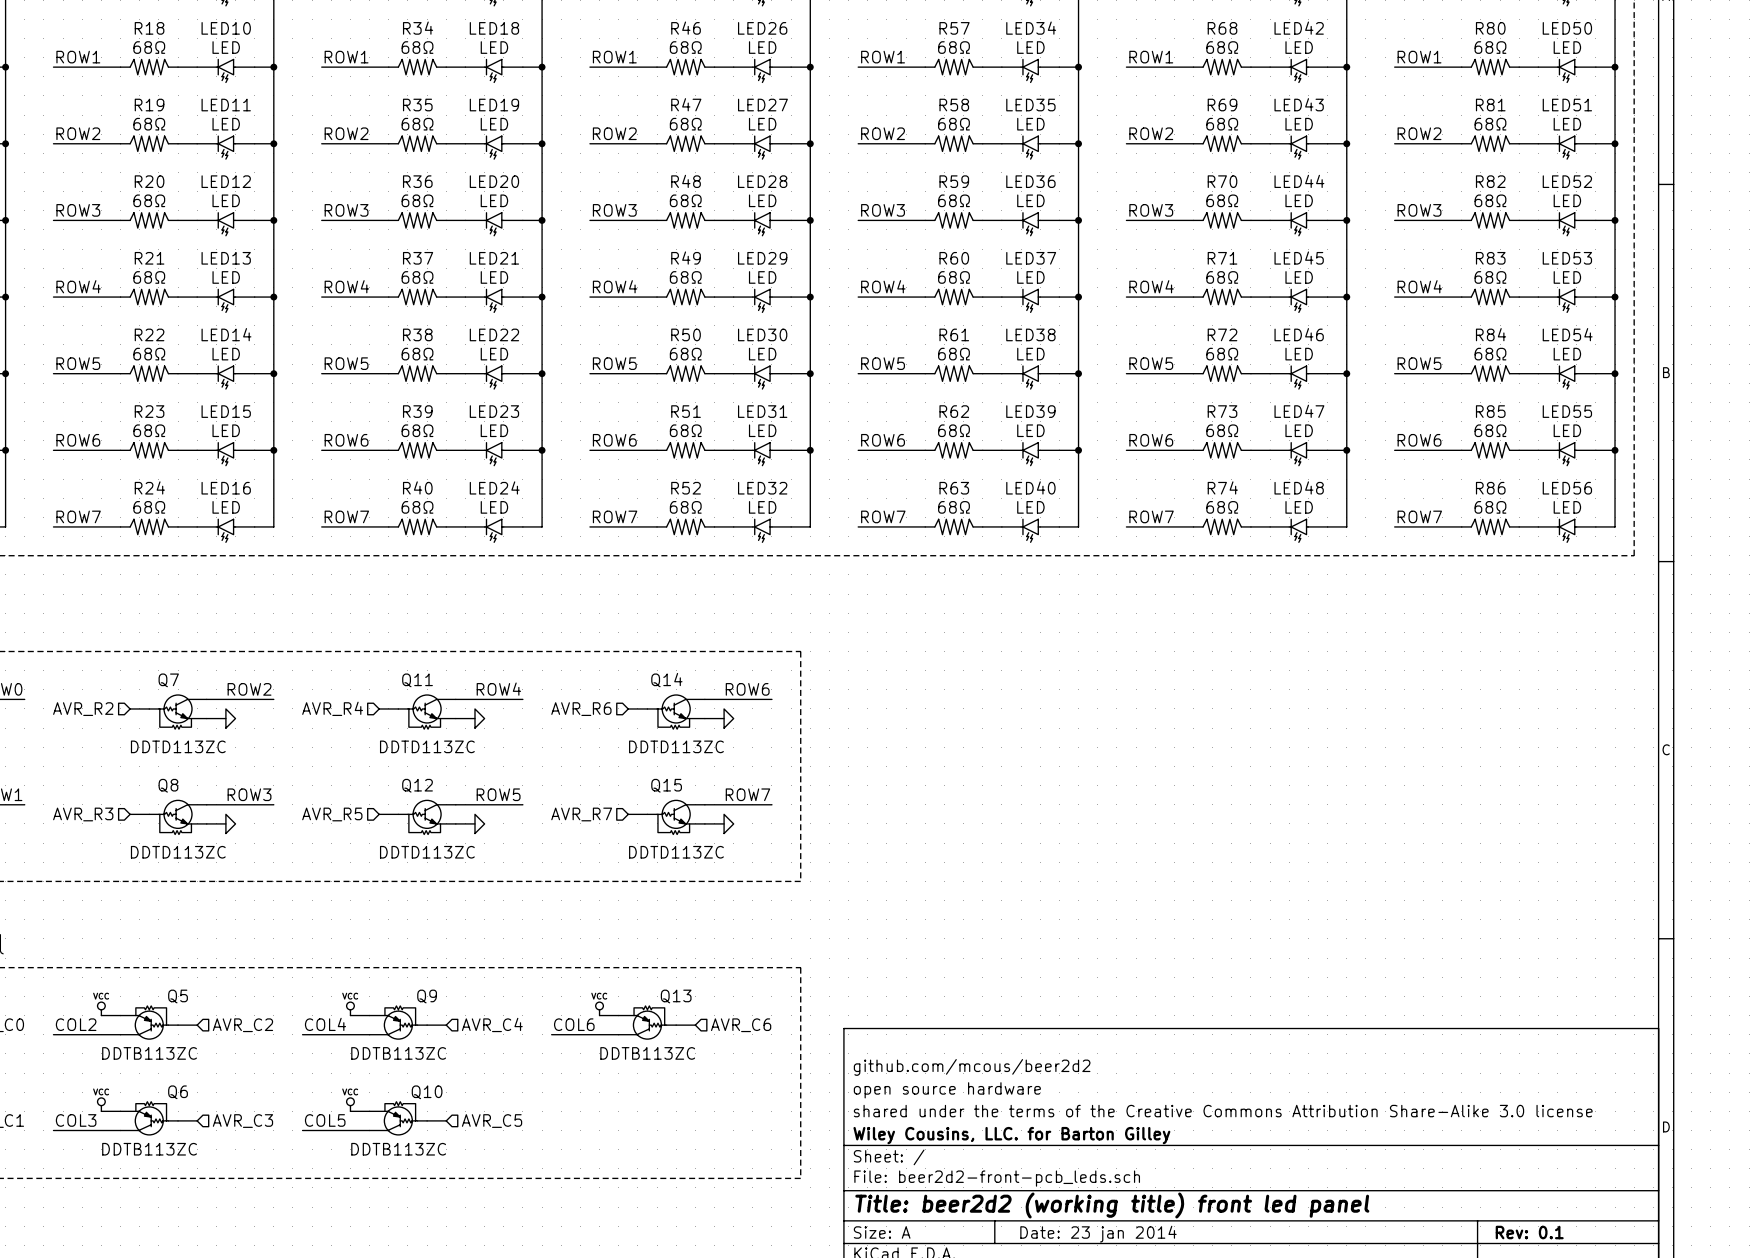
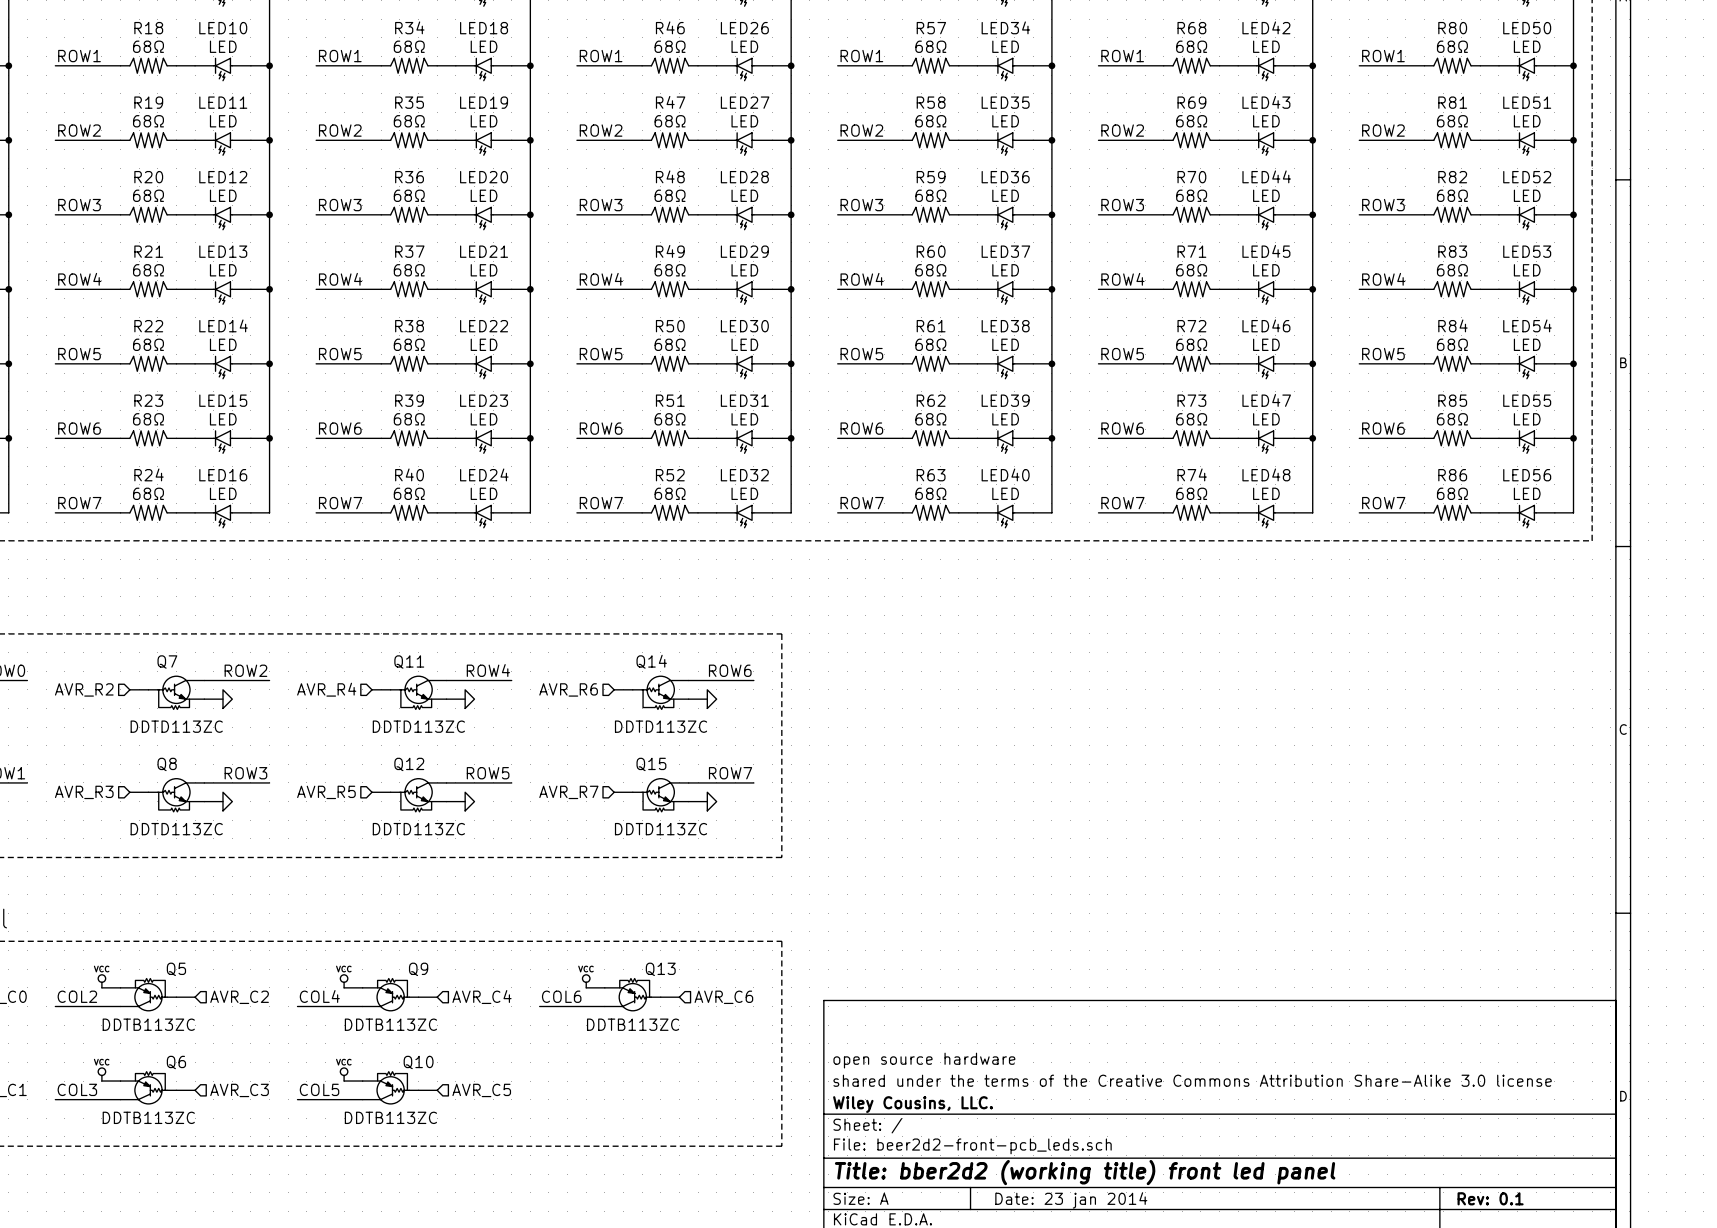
title block: github.com/mcous/beer2d2 (972, 1067) -> none
title block: Wiley Cousins, LLC. for Barton Gilley (1011, 1135) -> Wiley Cousins, LLC. (913, 1104)
title block: Title: beer2d2 (working title) front led panel (1112, 1205) -> Title: bber2d2 (working title) front led panel (1085, 1172)

